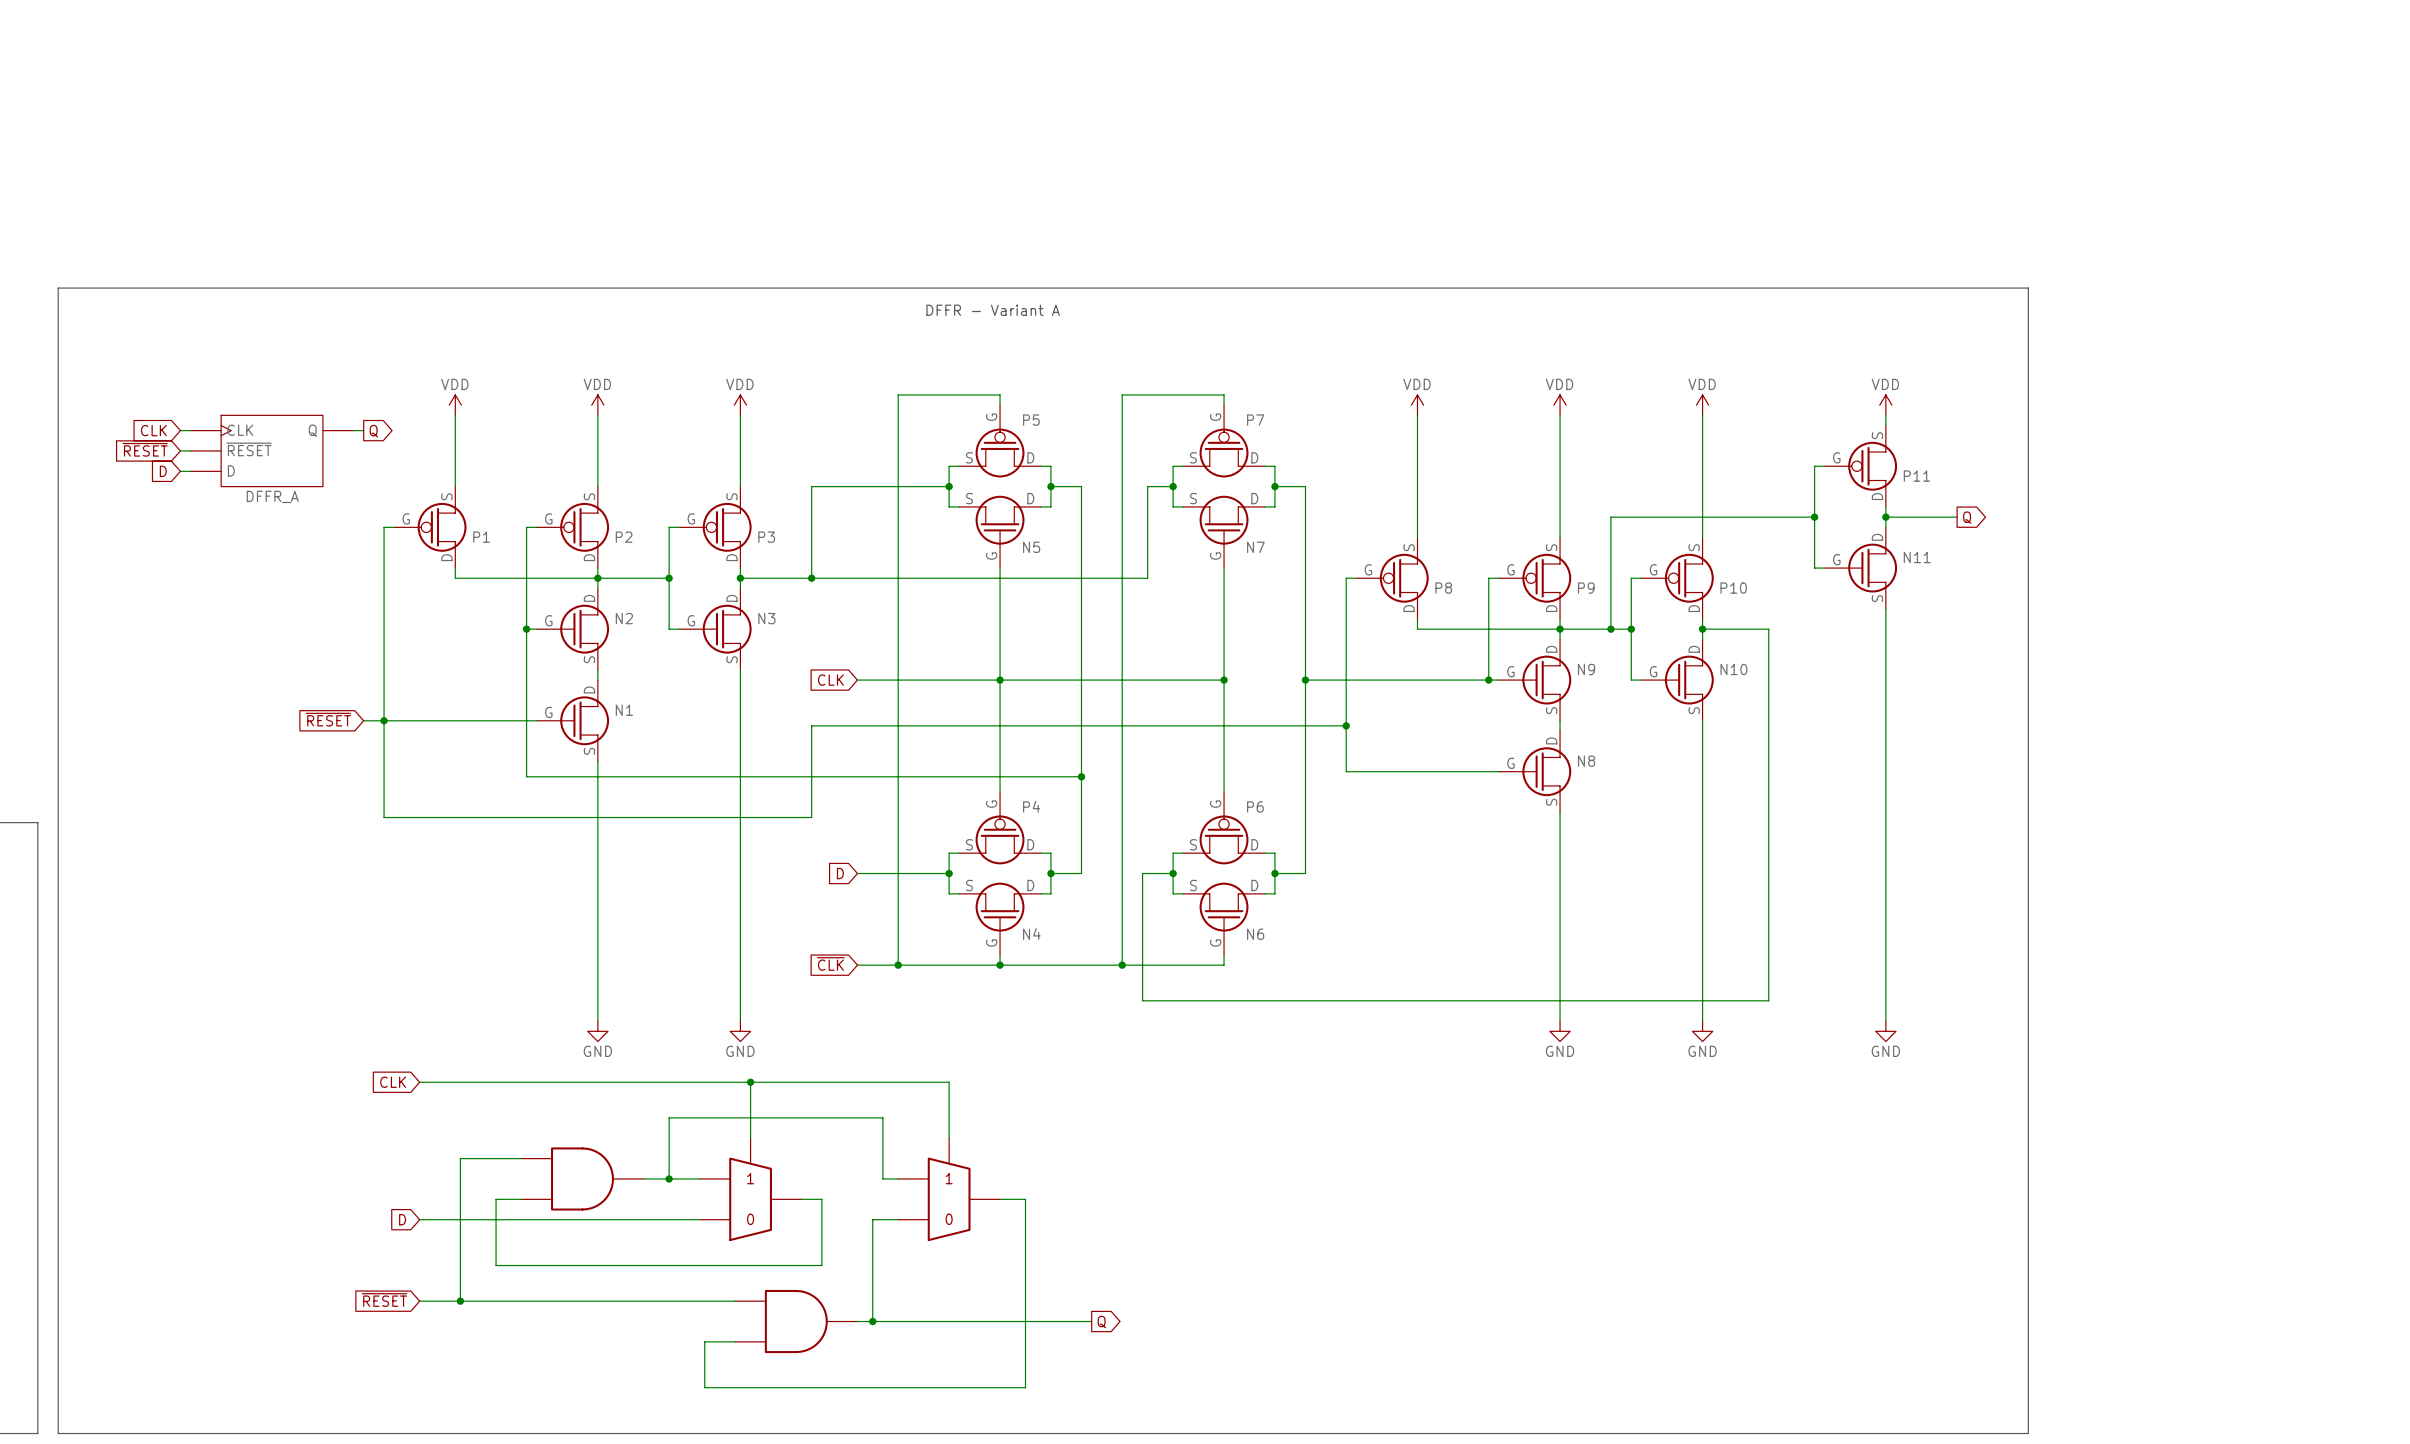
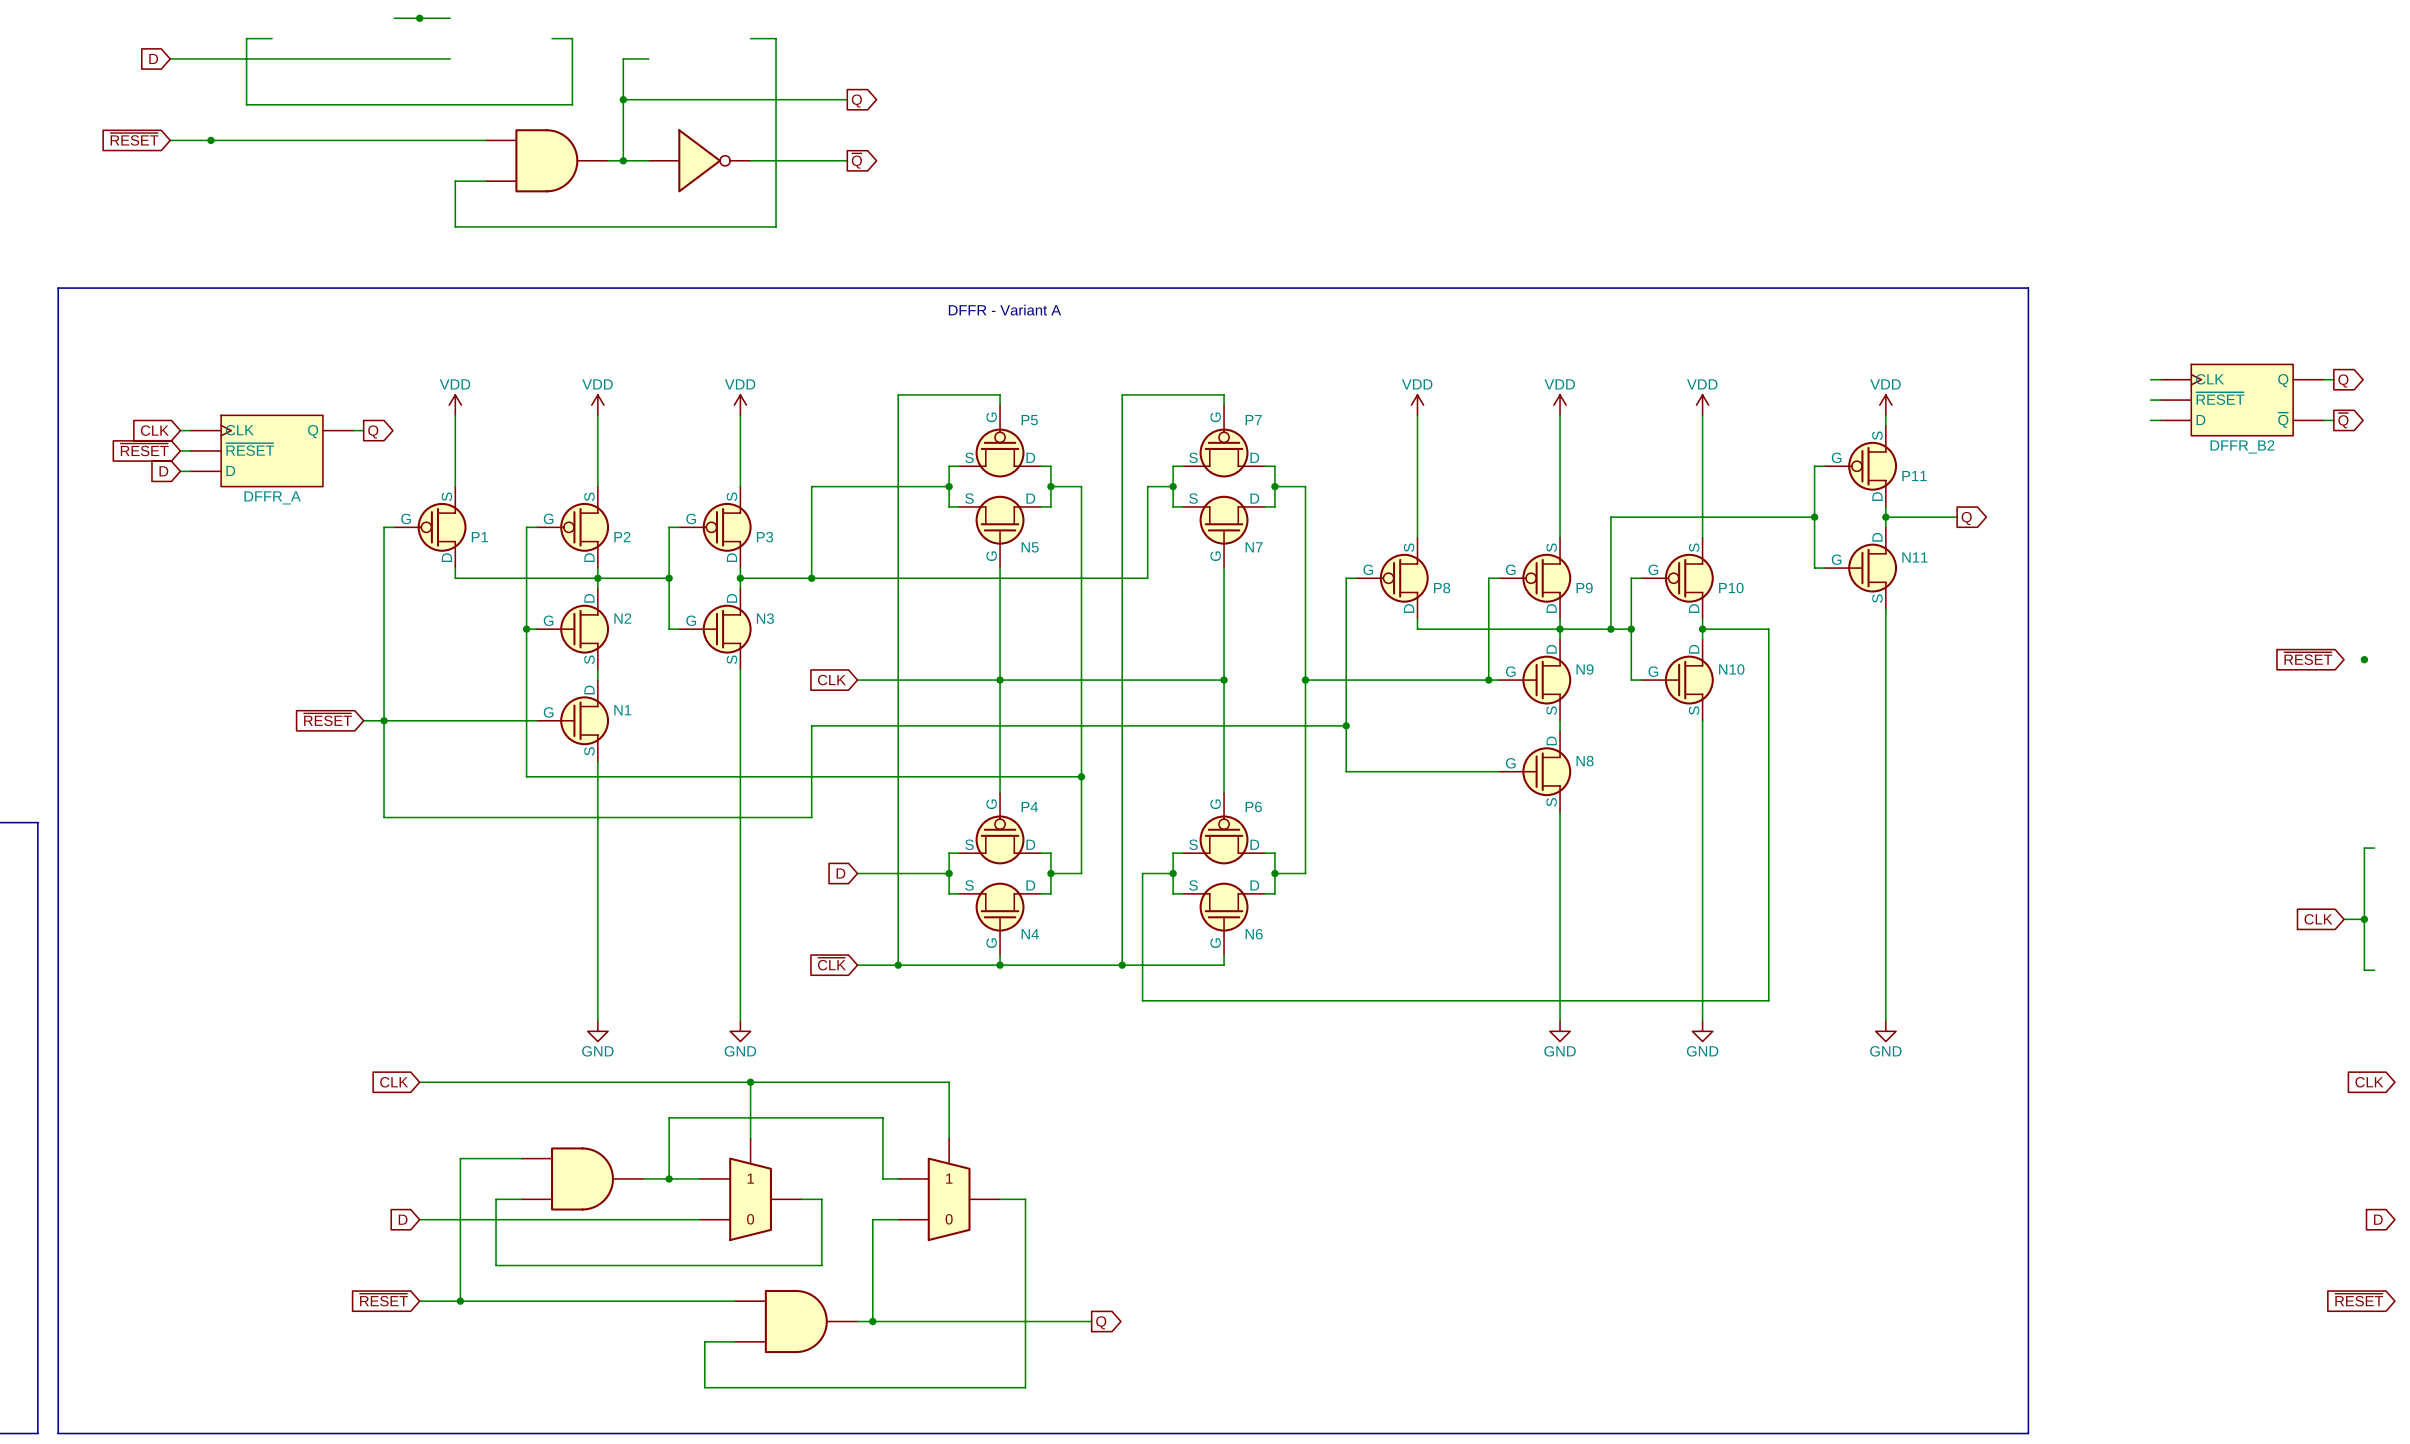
wire: none -> (394, 18) (450, 18)
junction: none -> (419, 18)
wire: none -> (272, 38) (246, 38) (246, 104) (572, 104) (572, 38) (552, 38)
wire: none -> (750, 38) (776, 38) (776, 226) (455, 226) (455, 181) (485, 181)
global label: none -> D (153, 58)
wire: none -> (170, 58) (450, 58)
wire: none -> (648, 58) (623, 58) (623, 160)
wire: none -> (623, 99) (847, 99)
junction: none -> (623, 99)
global label: none -> Q (856, 101)
global label: none -> ~{RESET} (134, 139)
wire: none -> (170, 140) (485, 140)
junction: none -> (210, 140)
part: none -> (546, 160)
wire: none -> (608, 160) (648, 160)
junction: none -> (623, 160)
part: none -> (699, 160)
wire: none -> (750, 160) (847, 160)
global label: none -> ~{Q} (856, 161)
wire: none -> (2150, 379) (2160, 379)
wire: none -> (2323, 379) (2333, 379)
global label: none -> Q (2343, 381)
wire: none -> (2150, 400) (2160, 400)
part: none -> DFFR_B2 (2242, 400)
global label: none -> ~{Q} (2343, 420)
wire: none -> (2150, 420) (2160, 420)
wire: none -> (2323, 420) (2333, 420)
global label: none -> ~{RESET} (2308, 658)
junction: none -> (2364, 659)
wire: none -> (2374, 848) (2364, 848) (2364, 970) (2374, 970)
global label: none -> CLK (2318, 919)
wire: none -> (2344, 919) (2364, 919)
junction: none -> (2364, 919)
global label: none -> CLK (2369, 1082)
global label: none -> D (2378, 1219)
global label: none -> ~{RESET} (2359, 1300)

